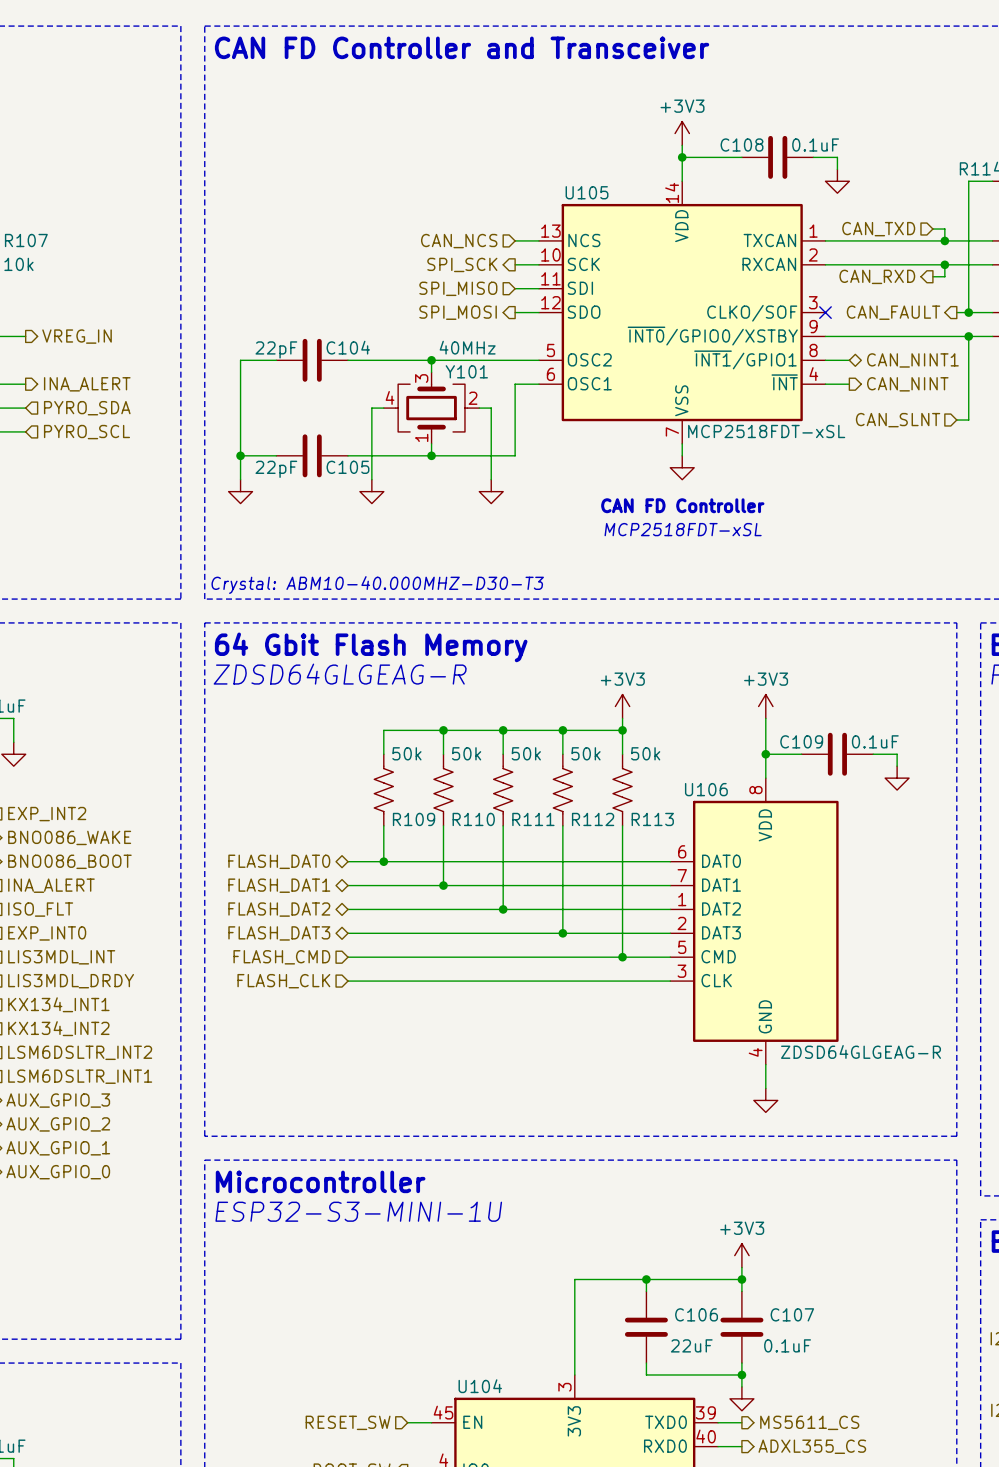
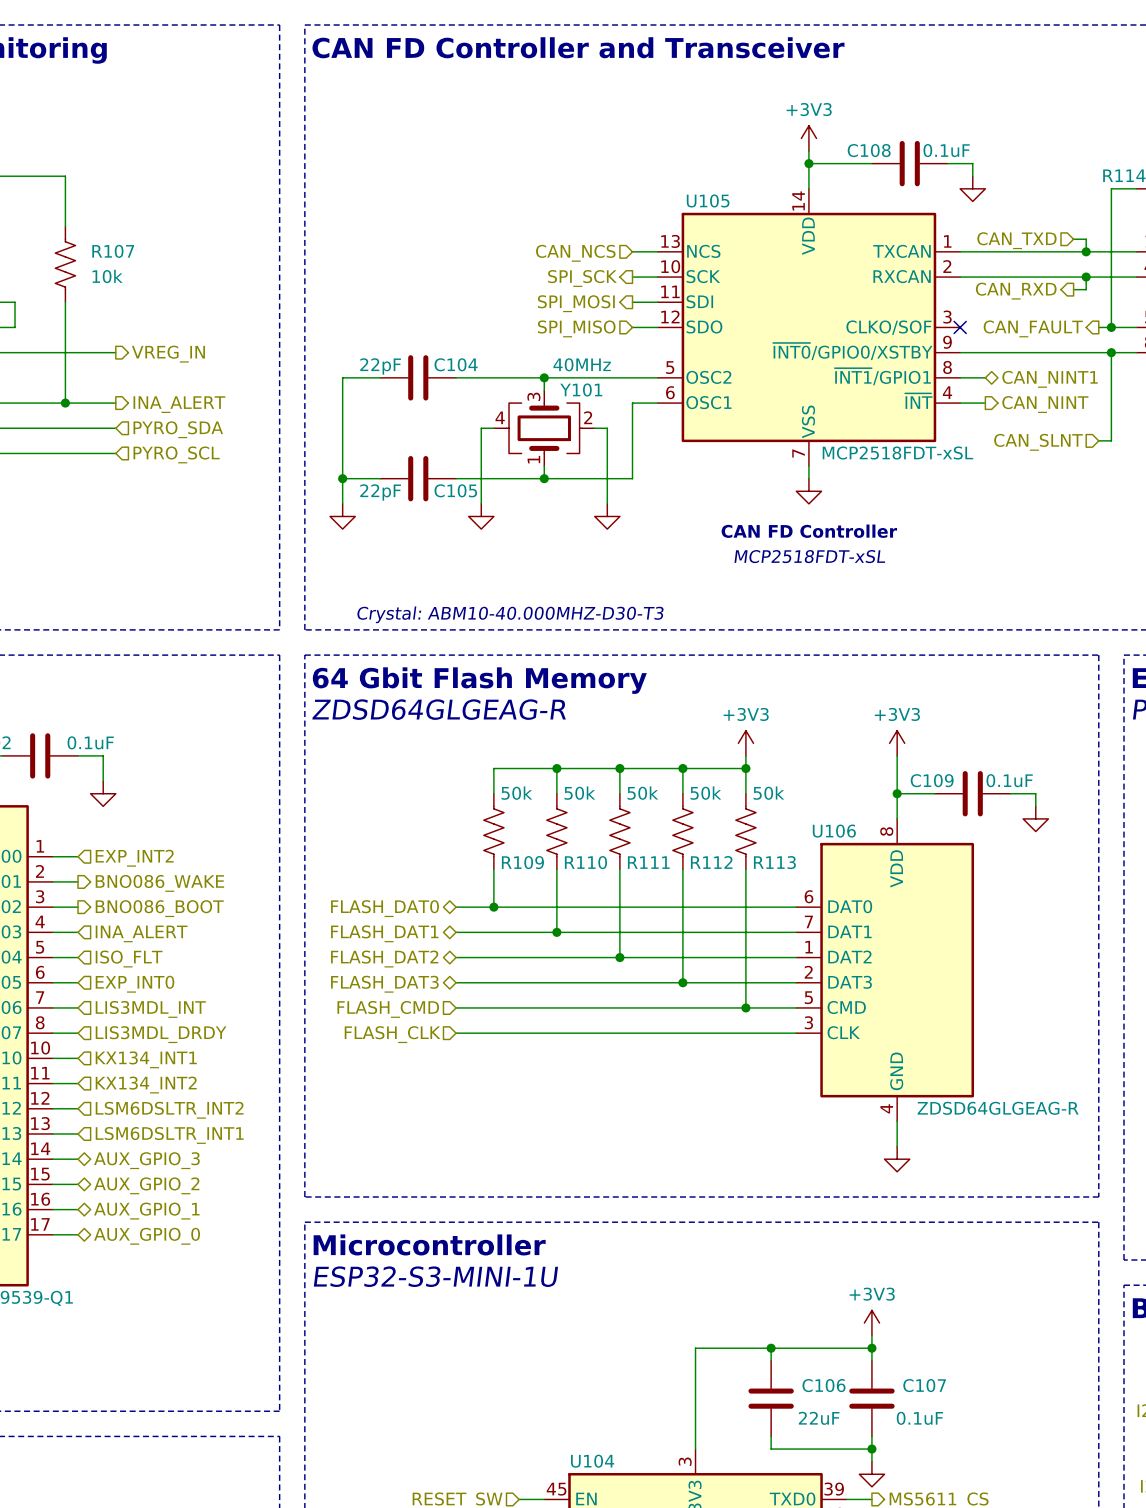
hierarchical label shape: input (458, 288) -> output (576, 303)
hierarchical label: SPI_MISO (458, 288) -> SPI_MOSI (576, 303)
hierarchical label shape: output (458, 312) -> input (576, 328)
hierarchical label: SPI_MOSI (458, 312) -> SPI_MISO (576, 328)

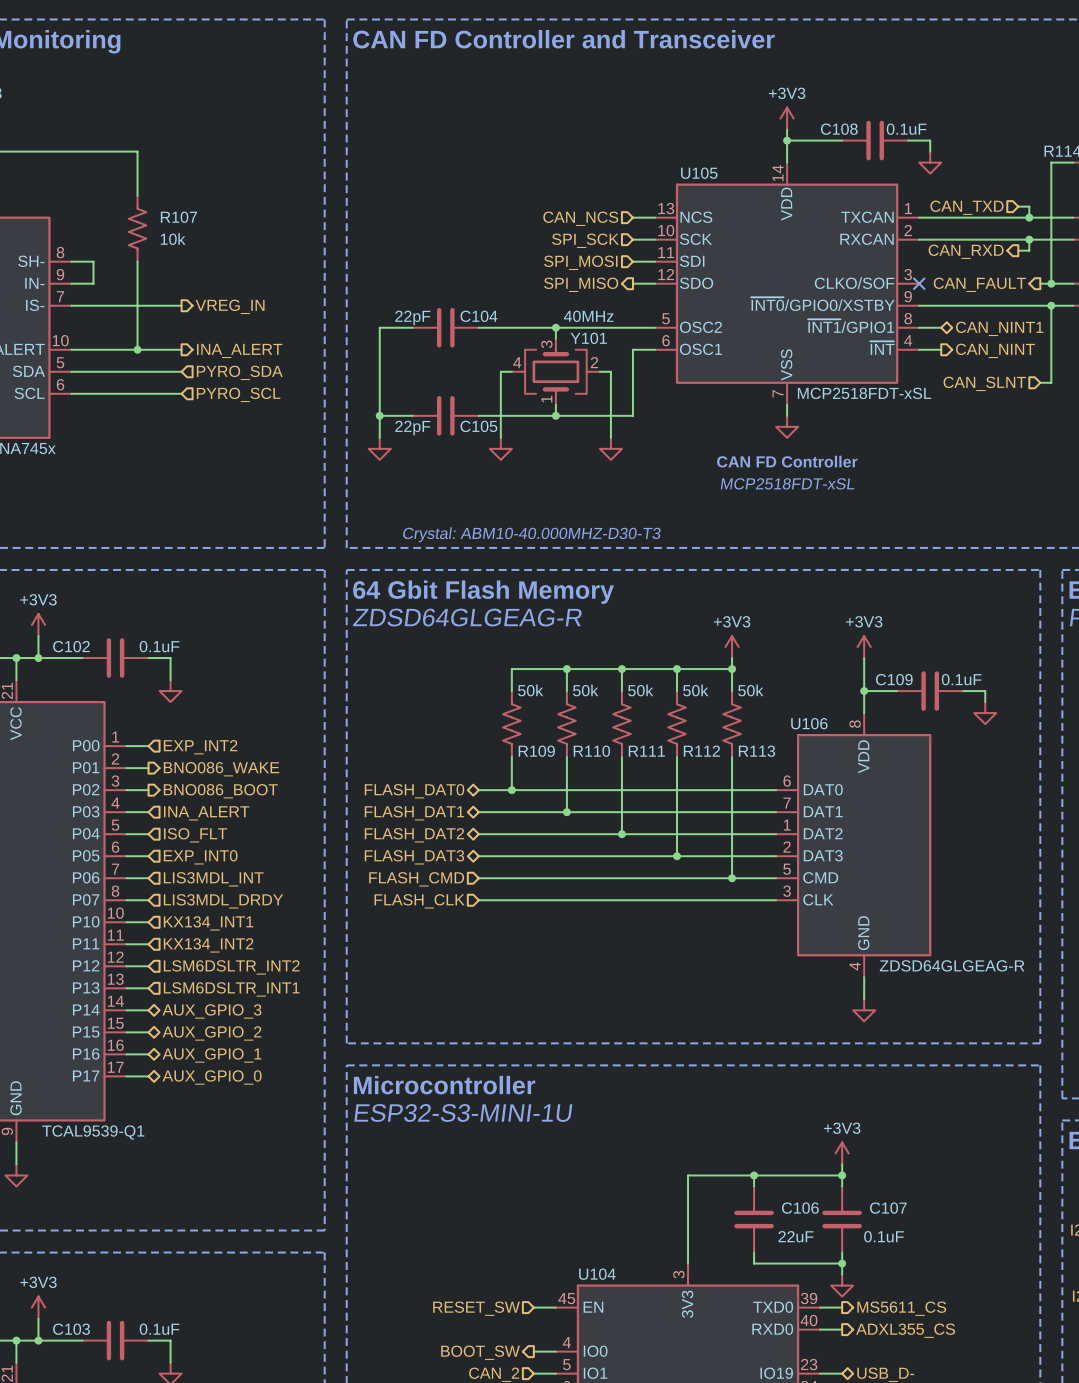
hierarchical label shape: output (582, 278) -> input (585, 240)
hierarchical label shape: output (576, 303) -> input (580, 262)
hierarchical label shape: input (576, 328) -> output (581, 284)

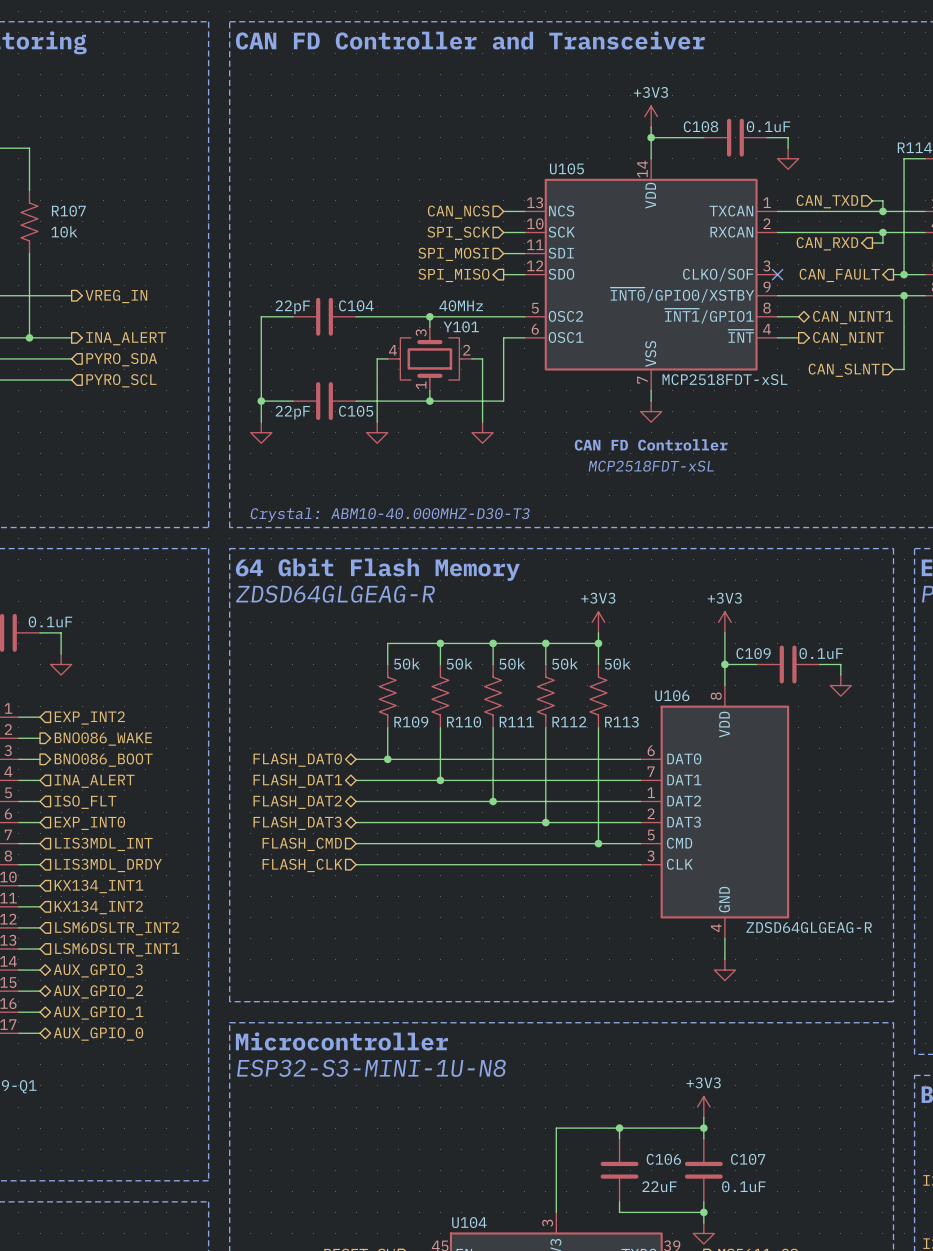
text: ESP32-S3-MINI-1U (463, 1112) -> ESP32-S3-MINI-1U-N8 (371, 1068)

